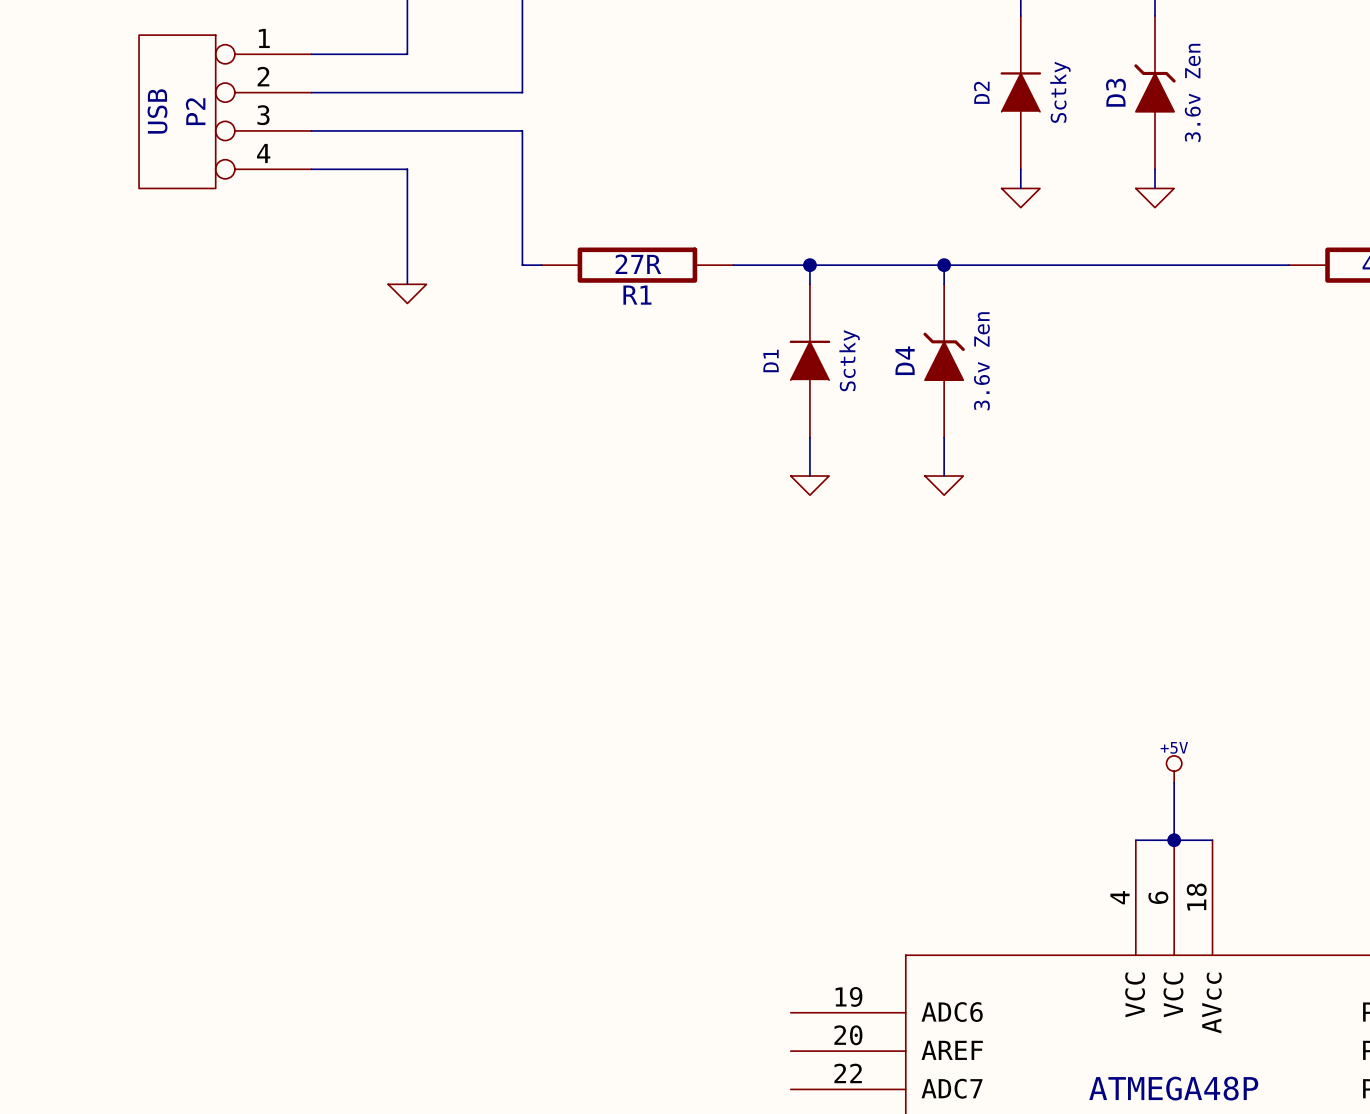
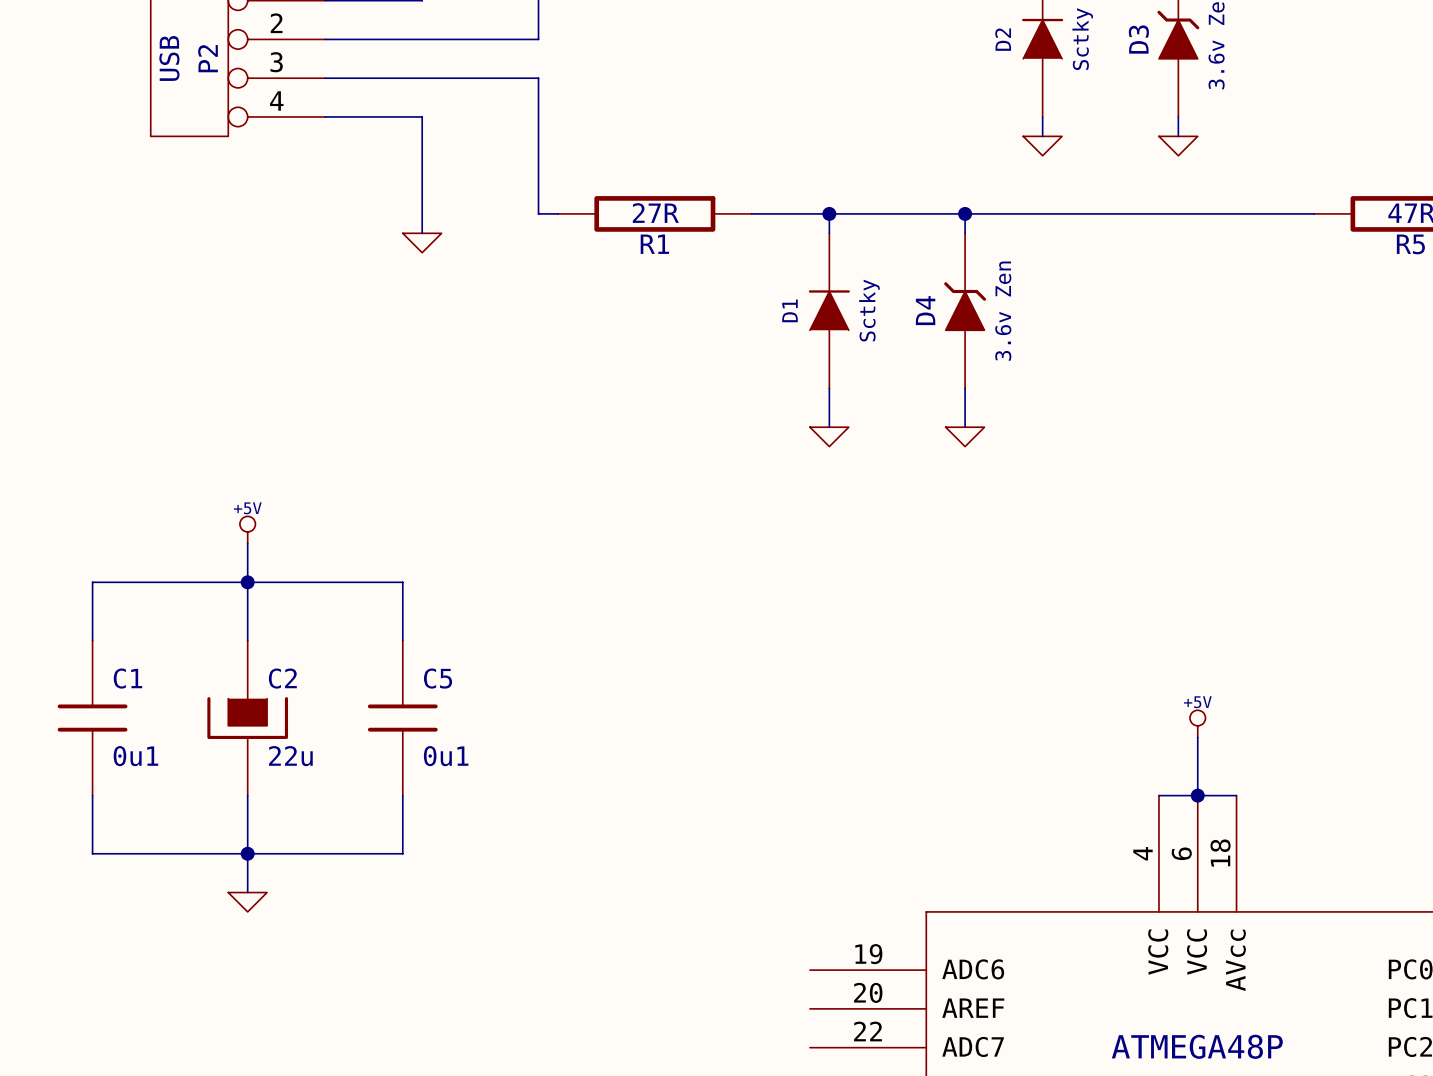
power symbol: none -> +5V (247, 529)
wire: none -> (247, 543) (247, 640)
junction: none -> (247, 582)
wire: none -> (92, 640) (92, 582) (402, 582) (402, 640)
C1: none -> 0u1 (92, 718)
C2: none -> 22u (247, 718)
C5: none -> 0u1 (402, 718)
wire: none -> (92, 795) (92, 853) (402, 853) (402, 795)
wire: none -> (247, 795) (247, 892)
junction: none -> (247, 853)
power symbol: none -> (247, 902)

